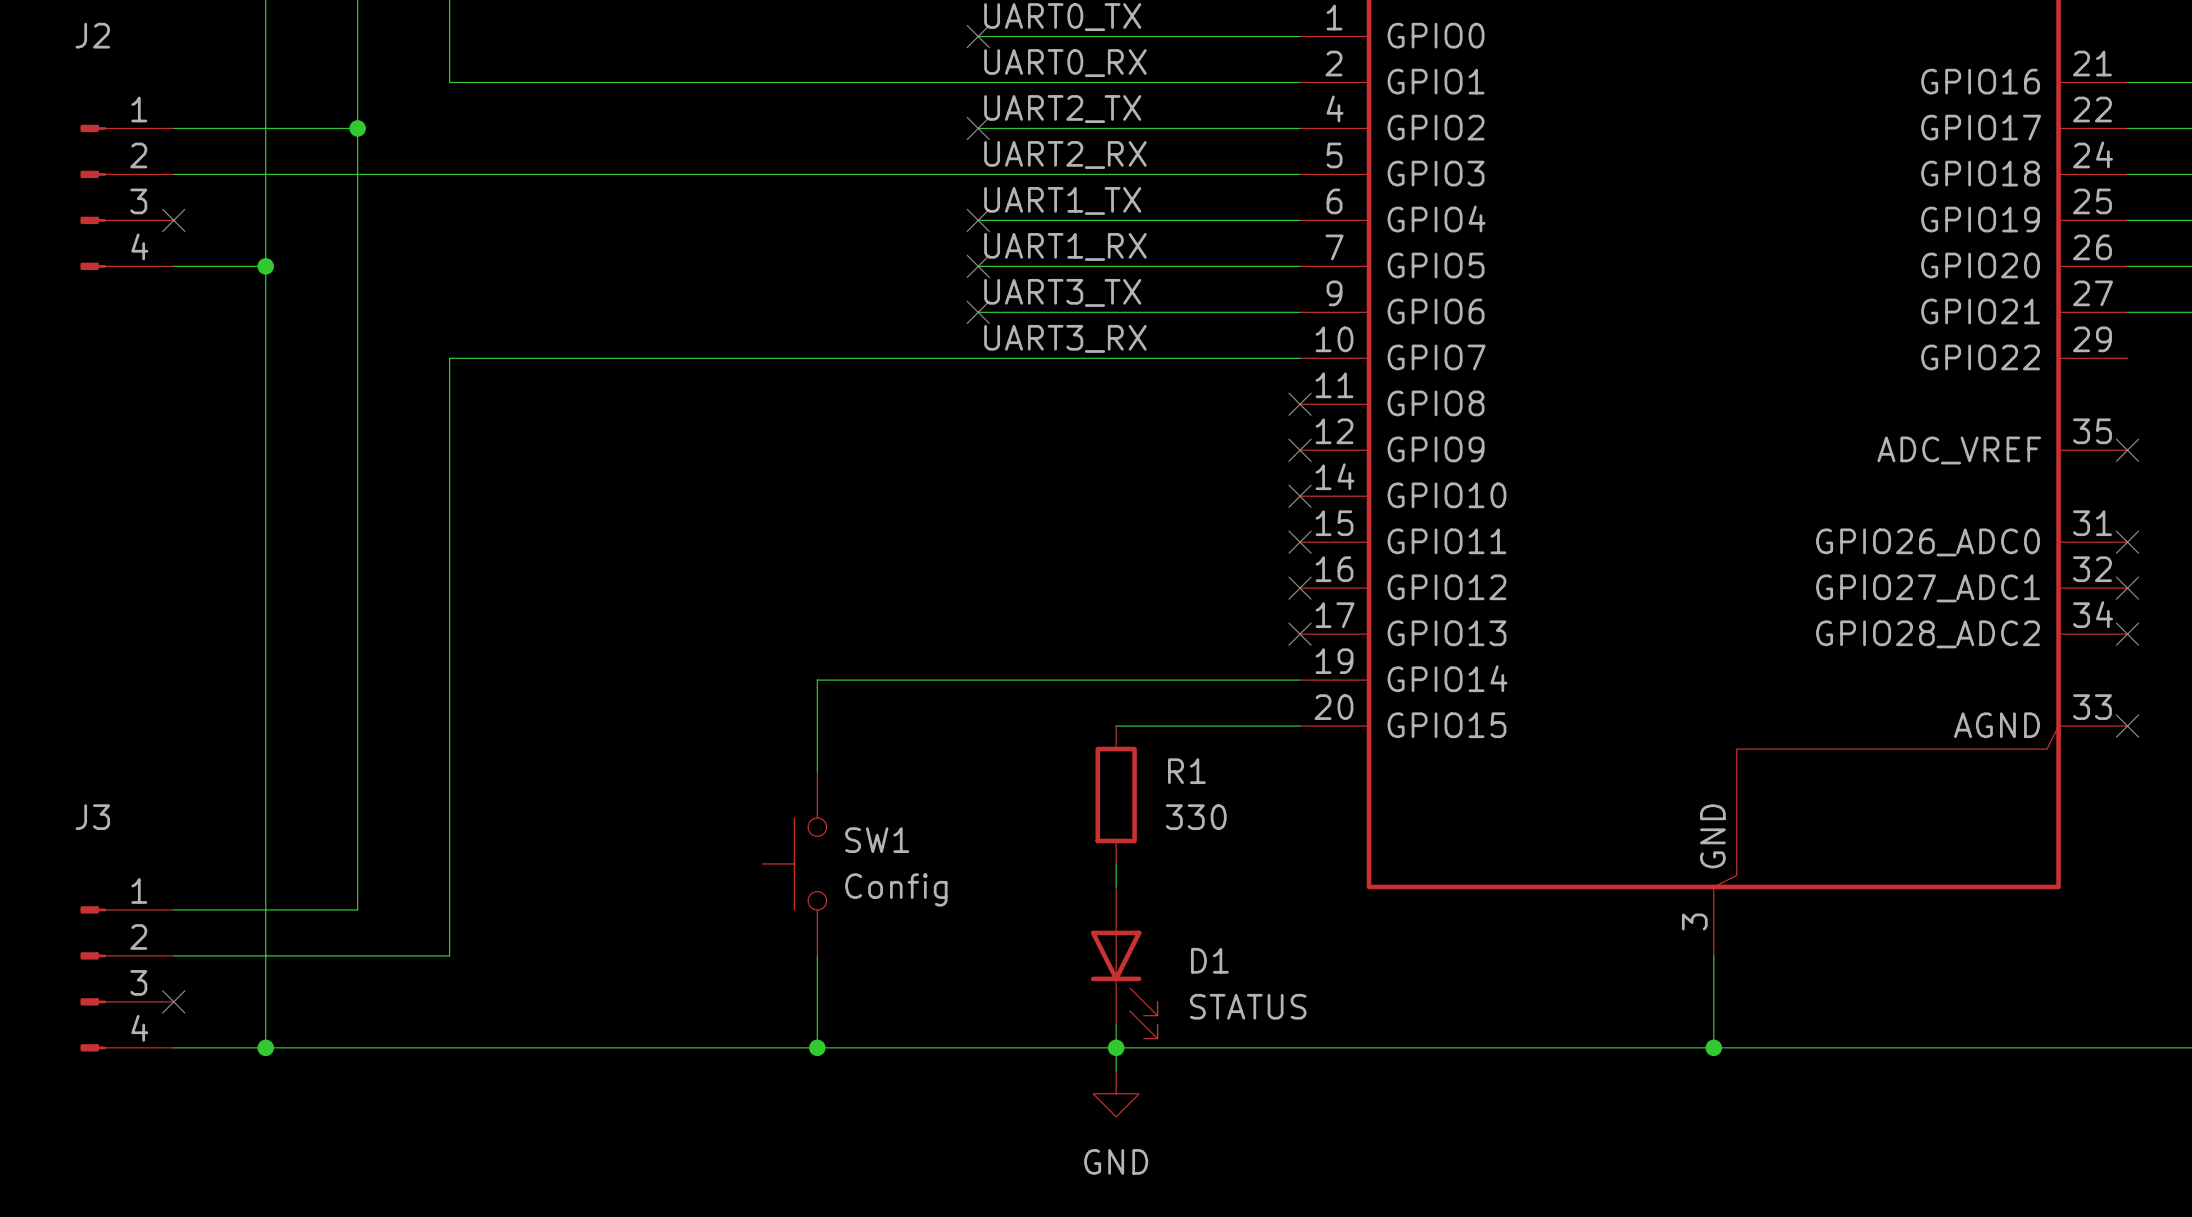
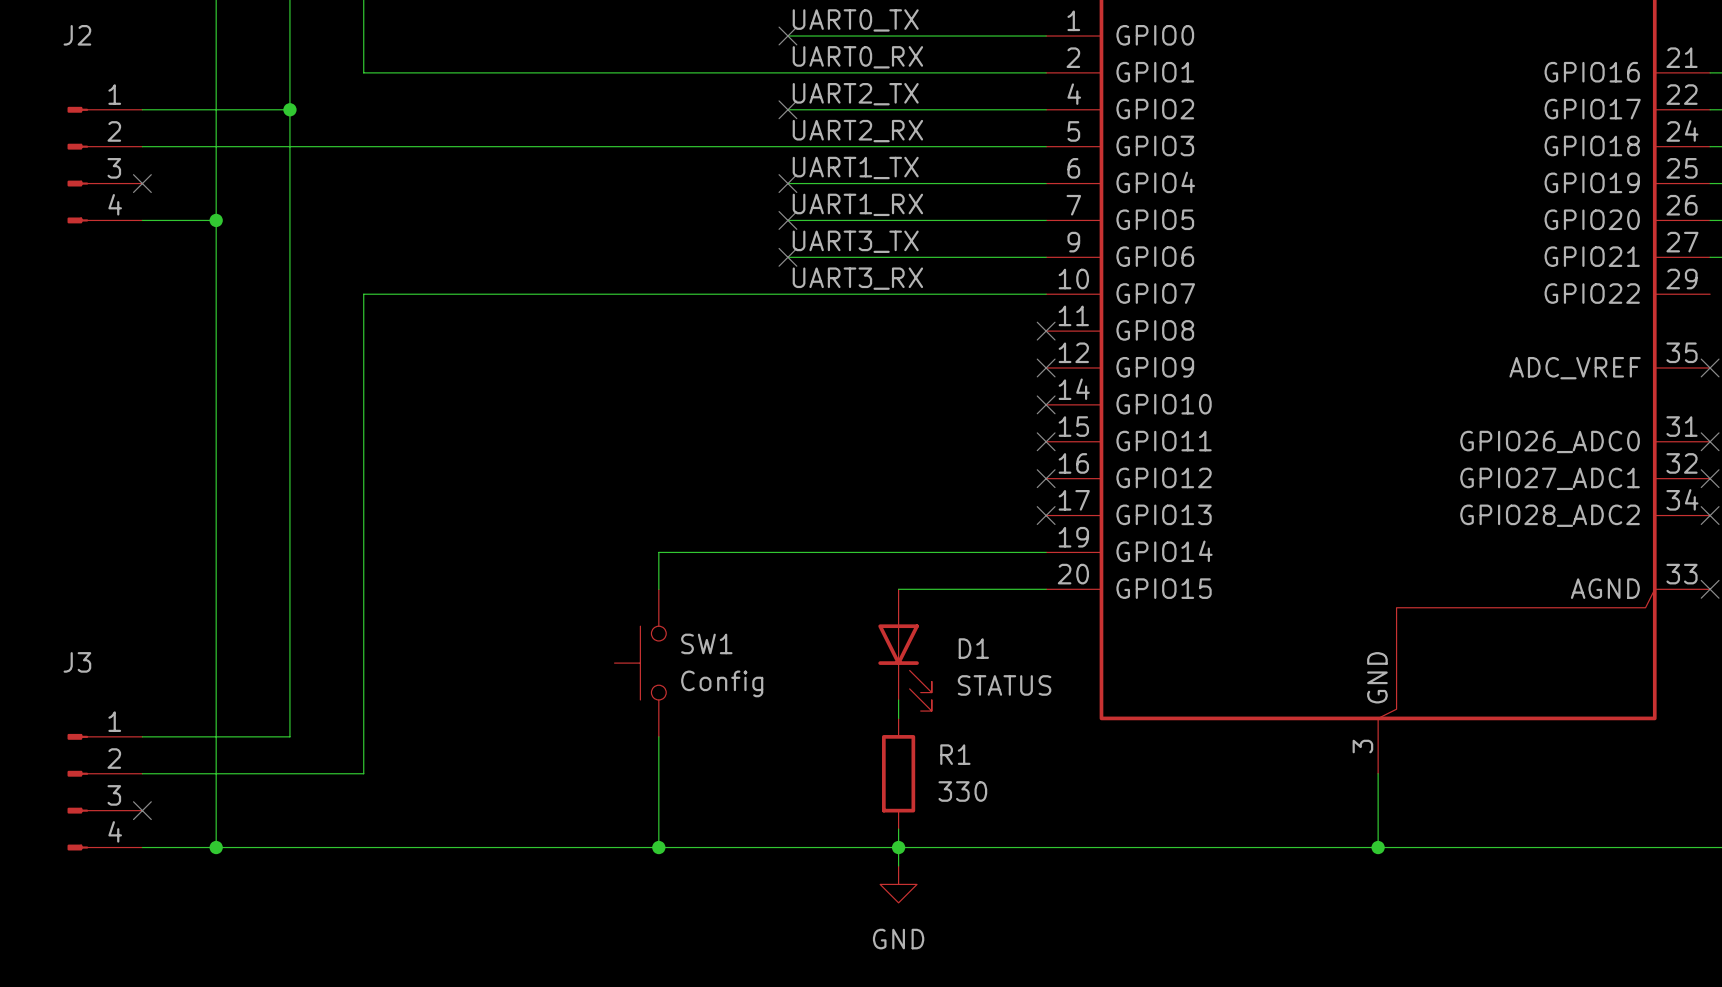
R1 position: (1116, 795) -> (898, 773)
SW1 position: (794, 863) -> (640, 663)
D1 position: (1124, 962) -> (905, 650)

